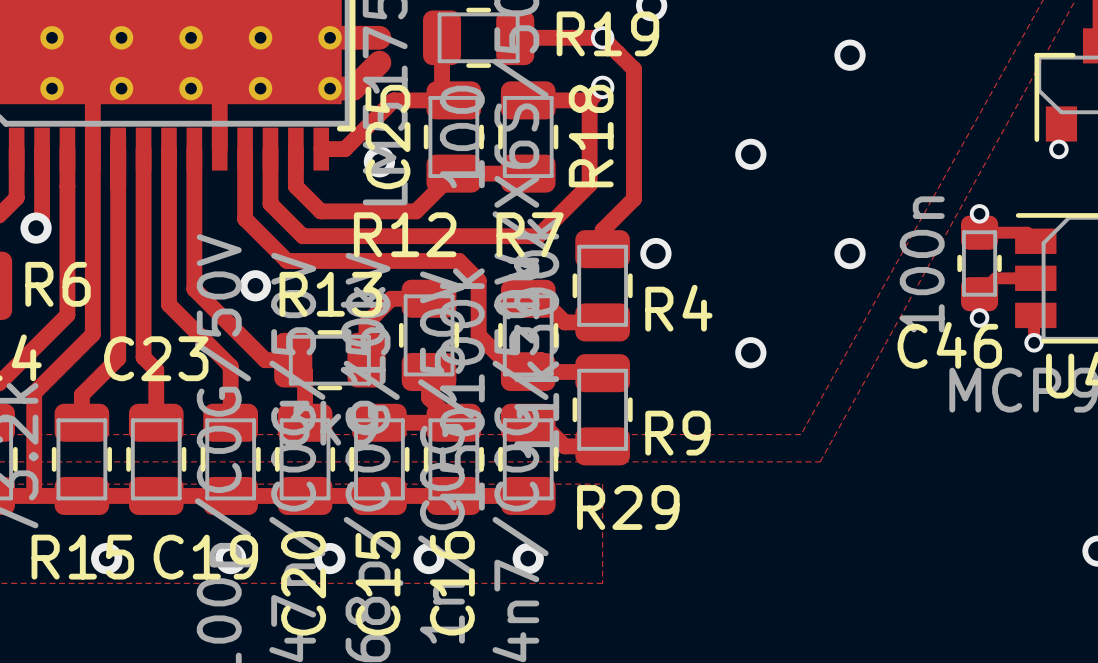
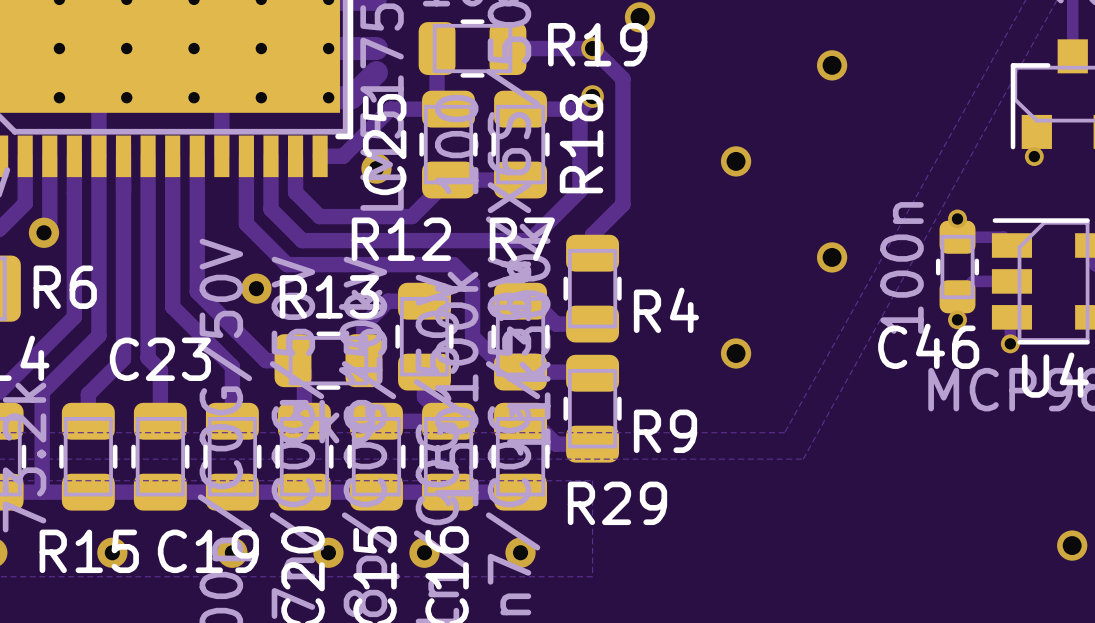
via: (655, 253) -> none

